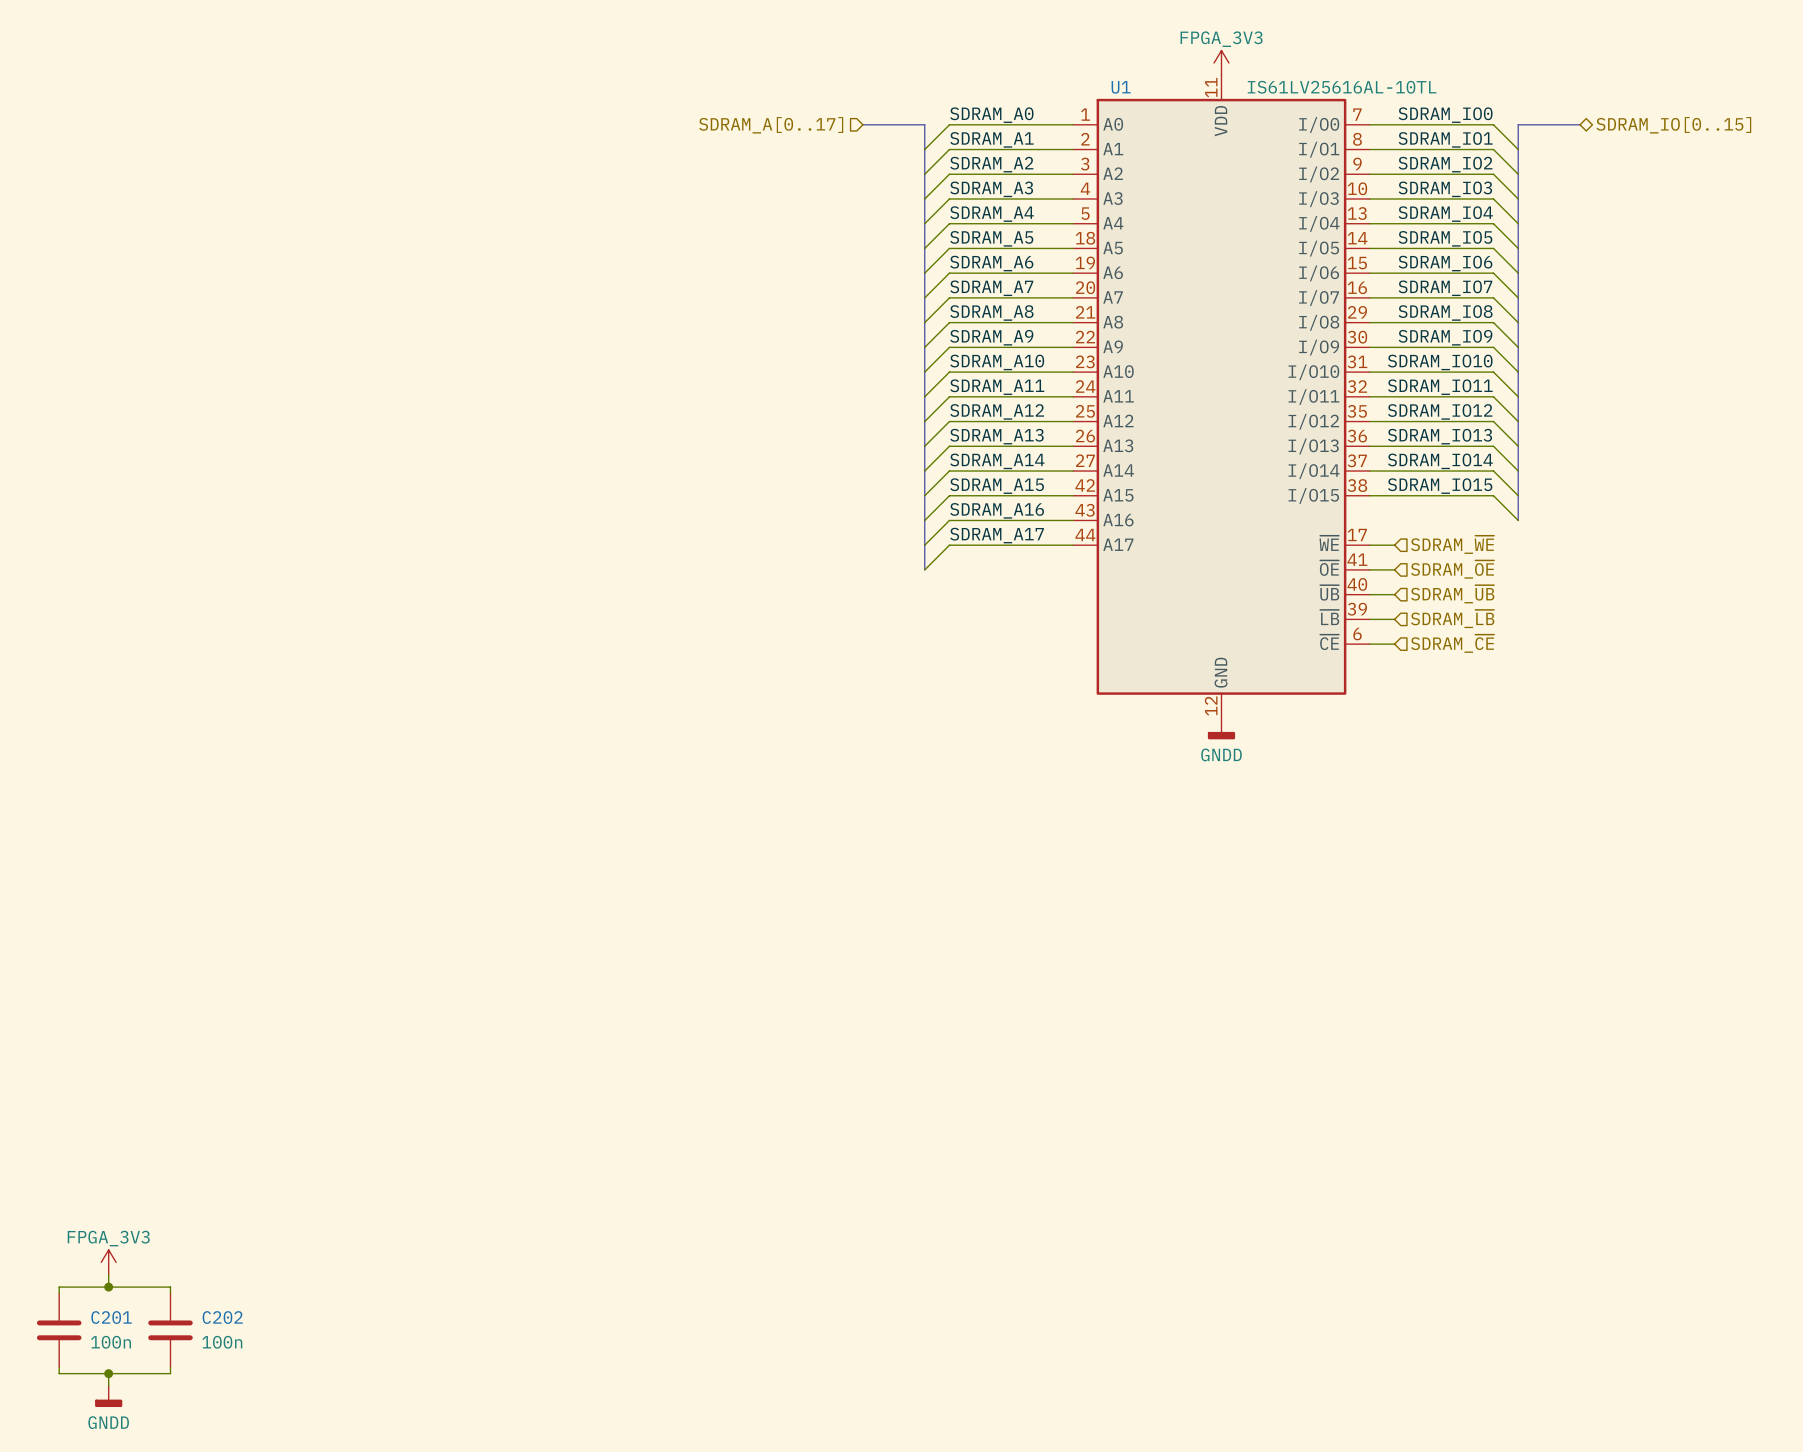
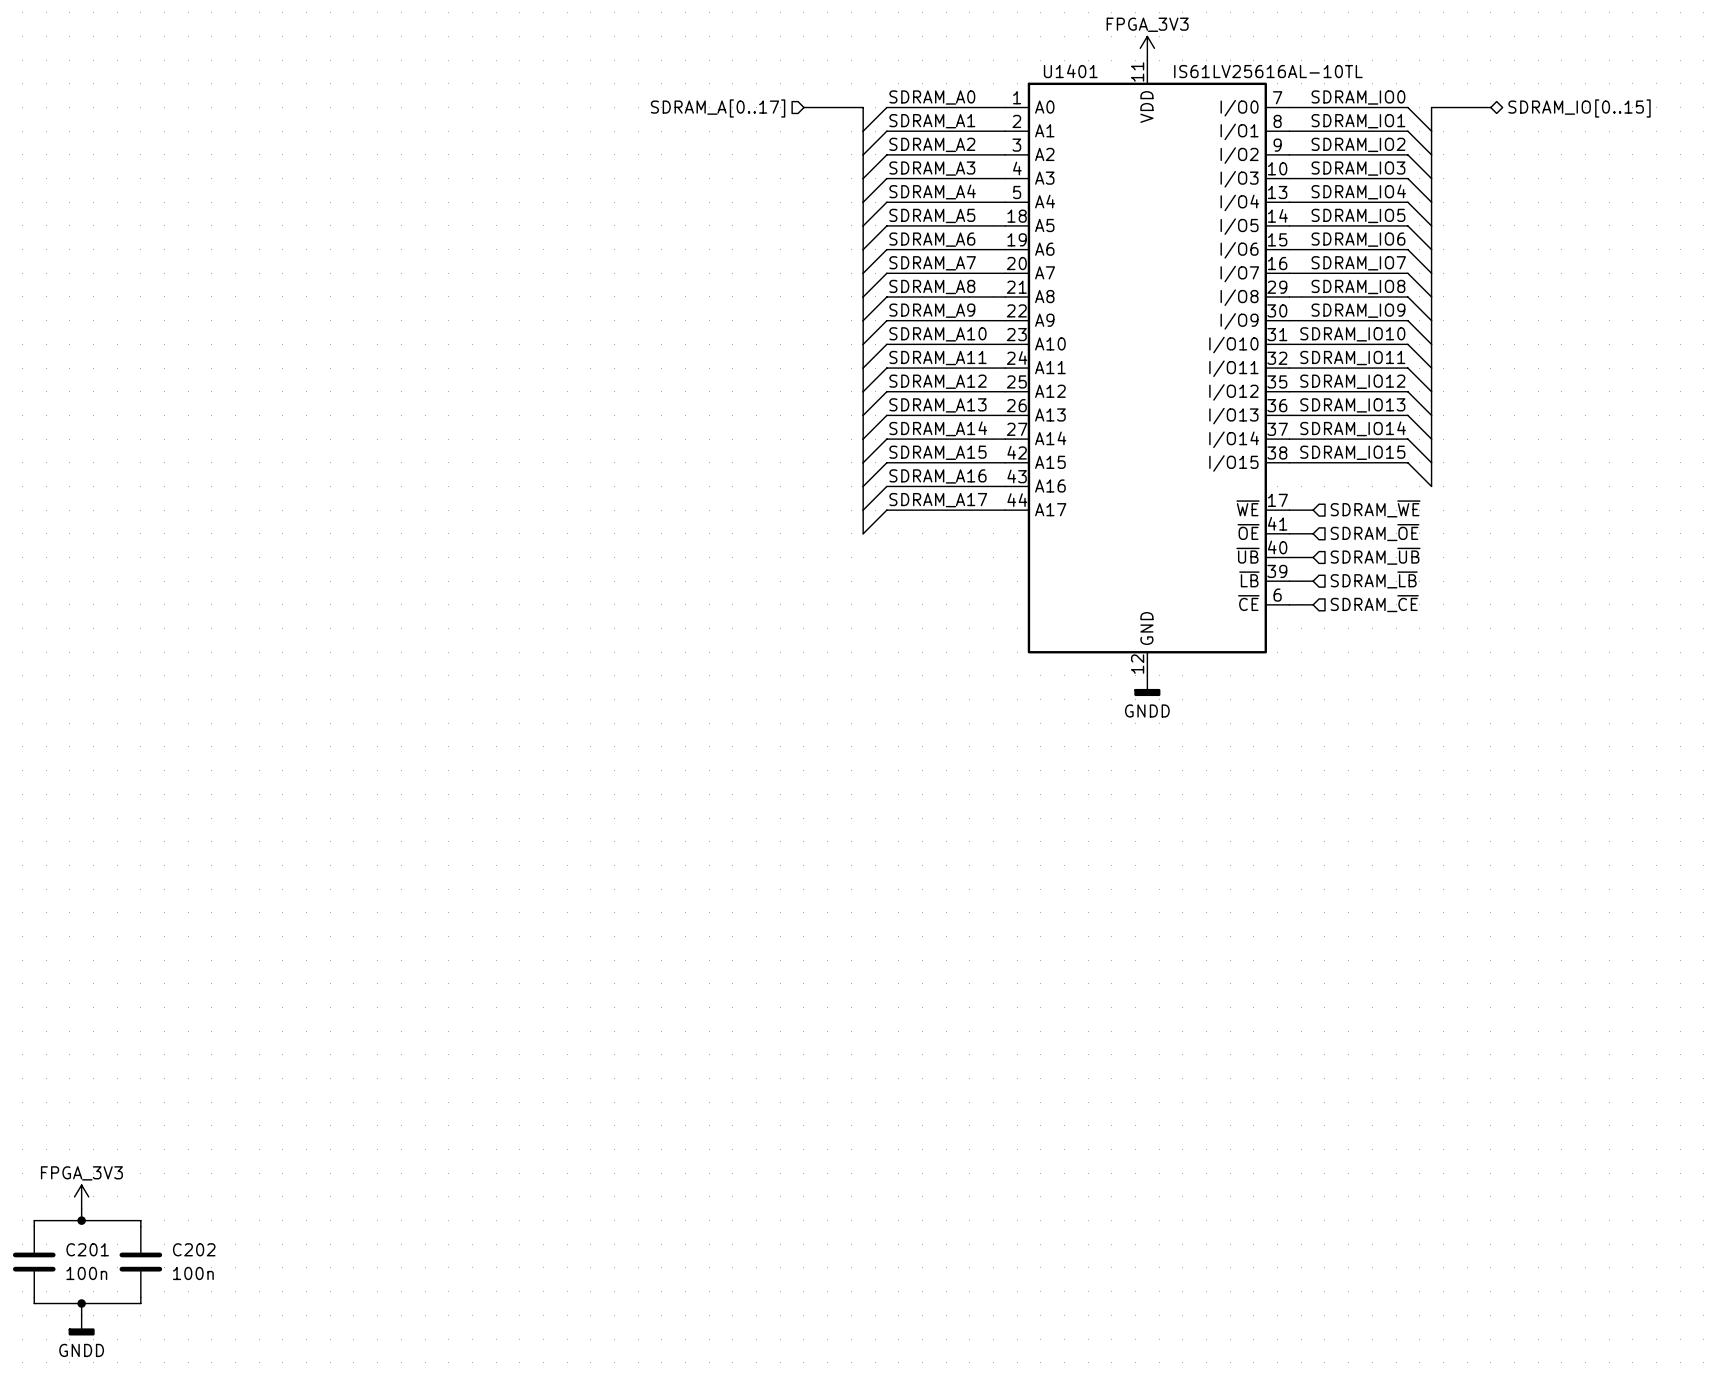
U1 name: U1 (1121, 87) -> U1401 (1070, 71)

